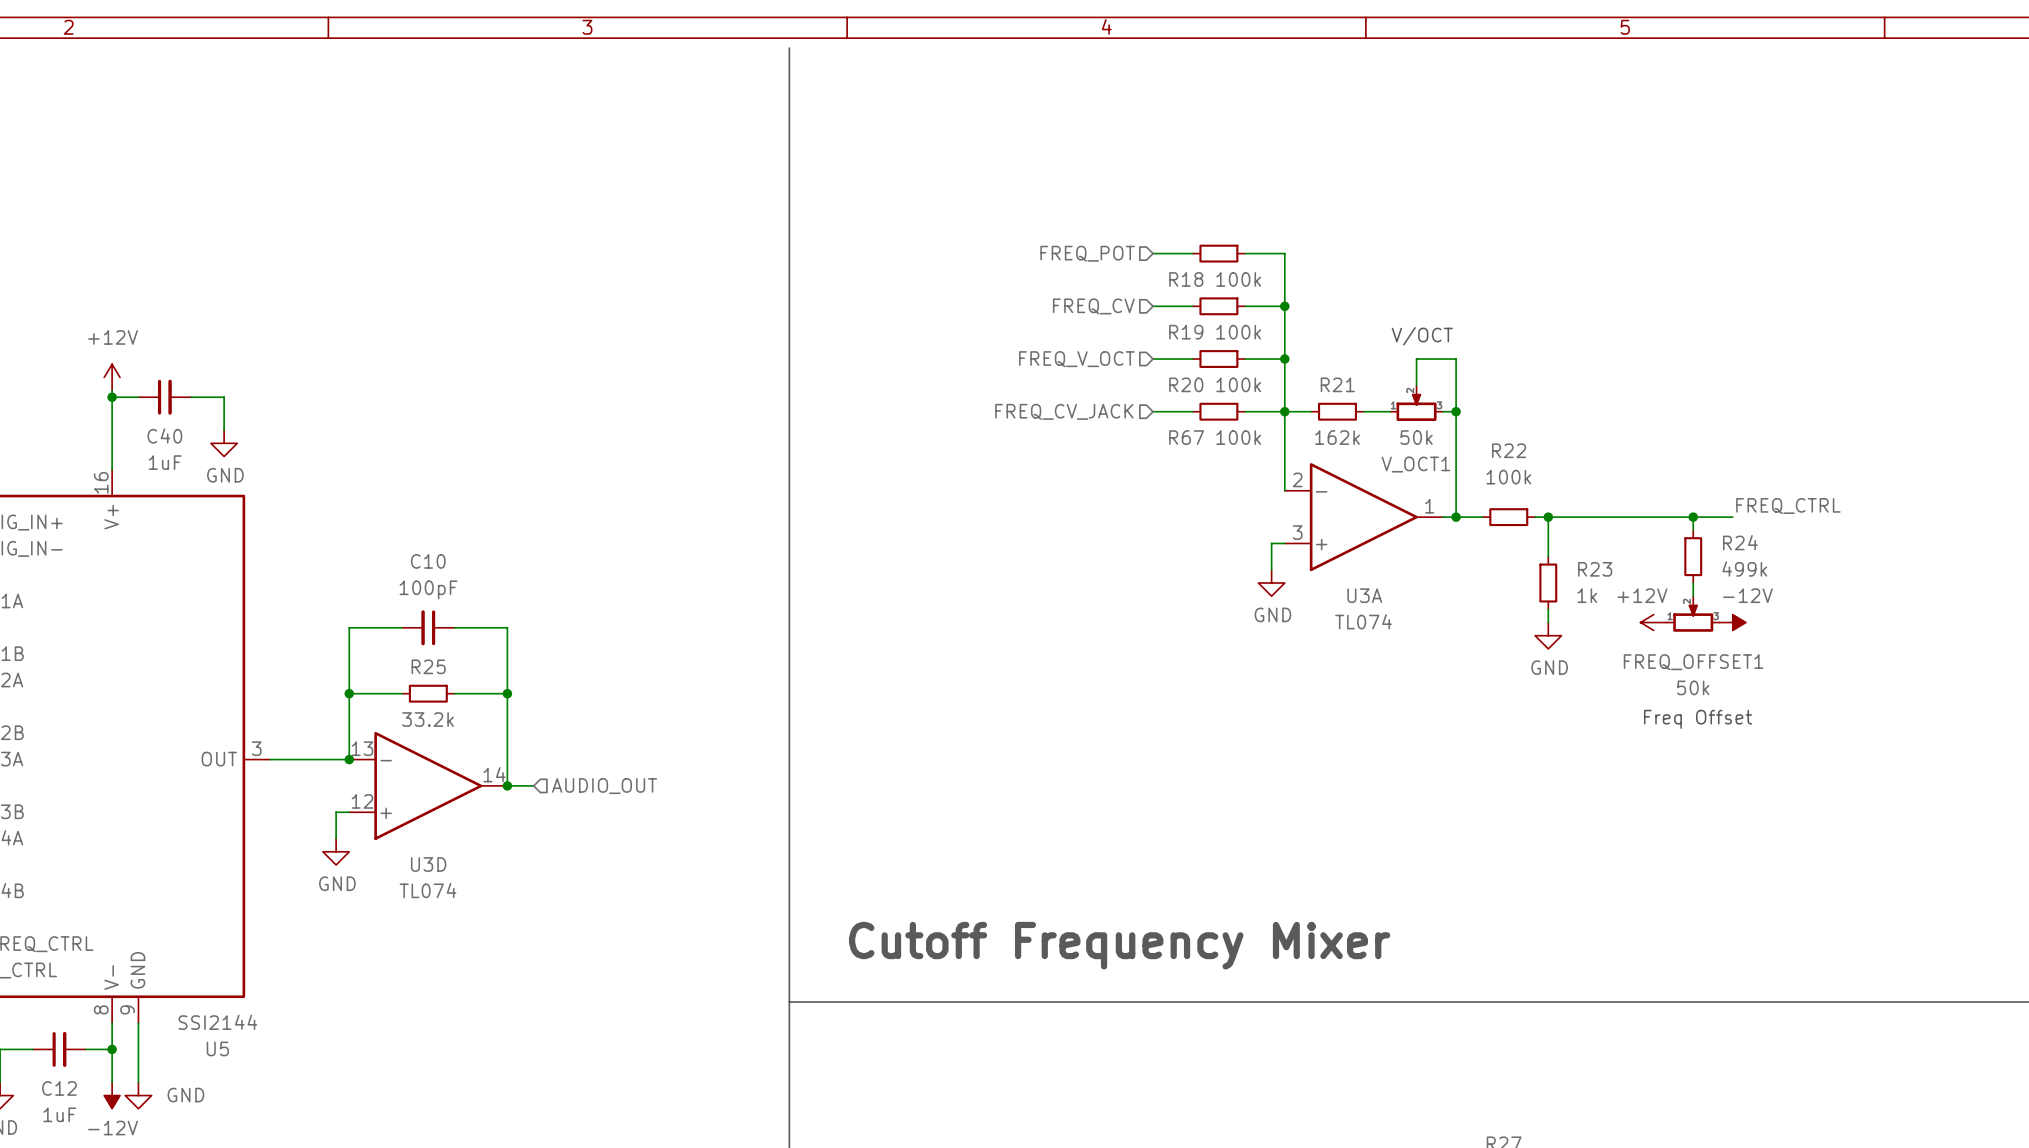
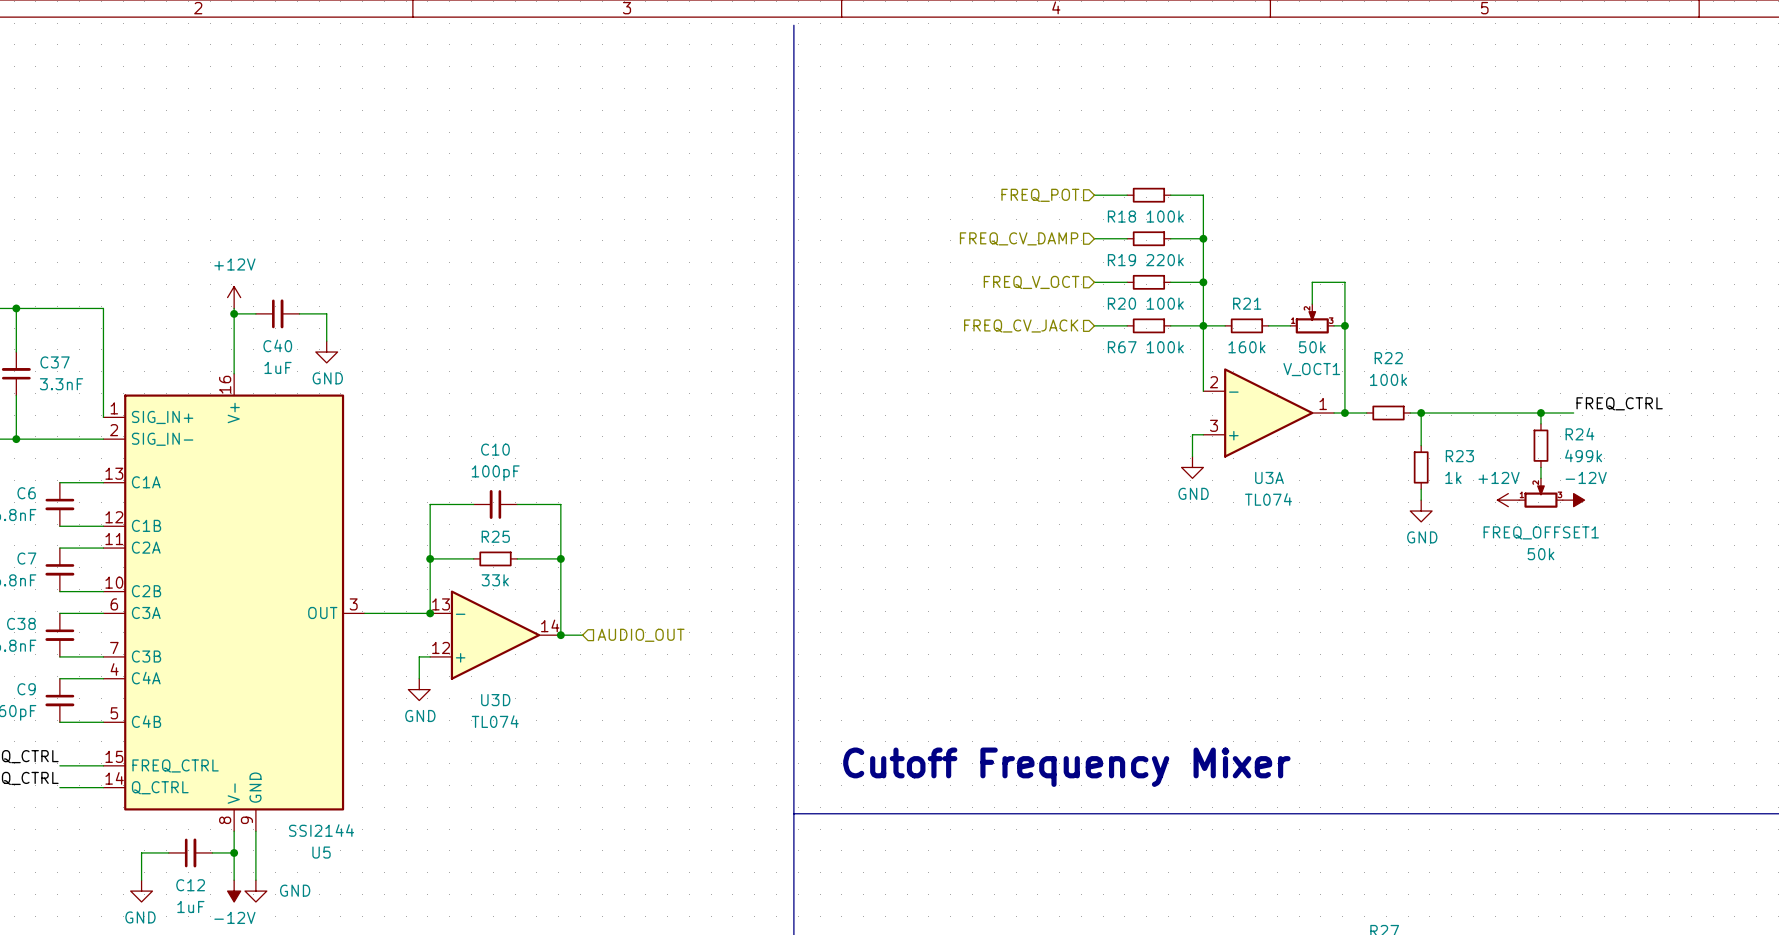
hierarchical label: FREQ_CV (1093, 306) -> FREQ_CV_DAMP (1019, 238)
R19 value: 100k (1238, 332) -> 220k (1165, 260)
text: V/OCT (1422, 336) -> none
R21 value: 162k (1337, 437) -> 160k (1246, 347)
R25 value: 33.2k (428, 719) -> 33k (495, 580)
text: Freq Offset (1698, 719) -> none

